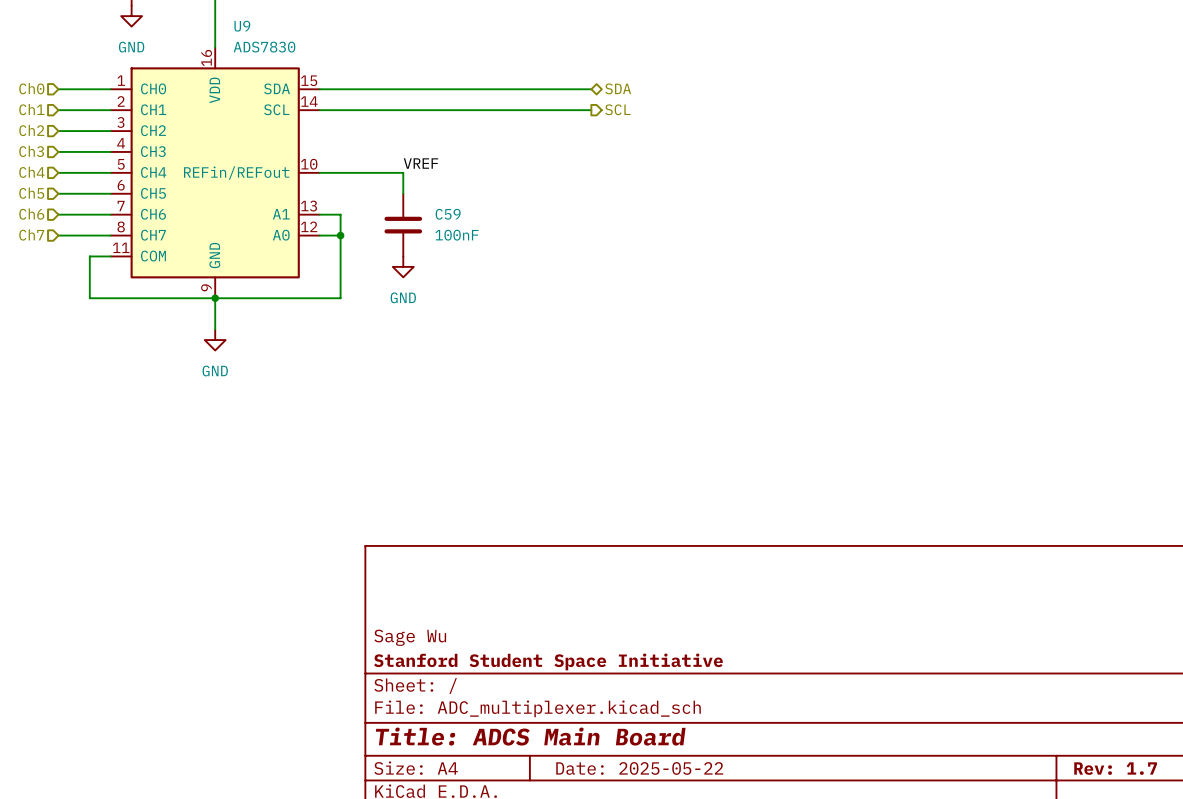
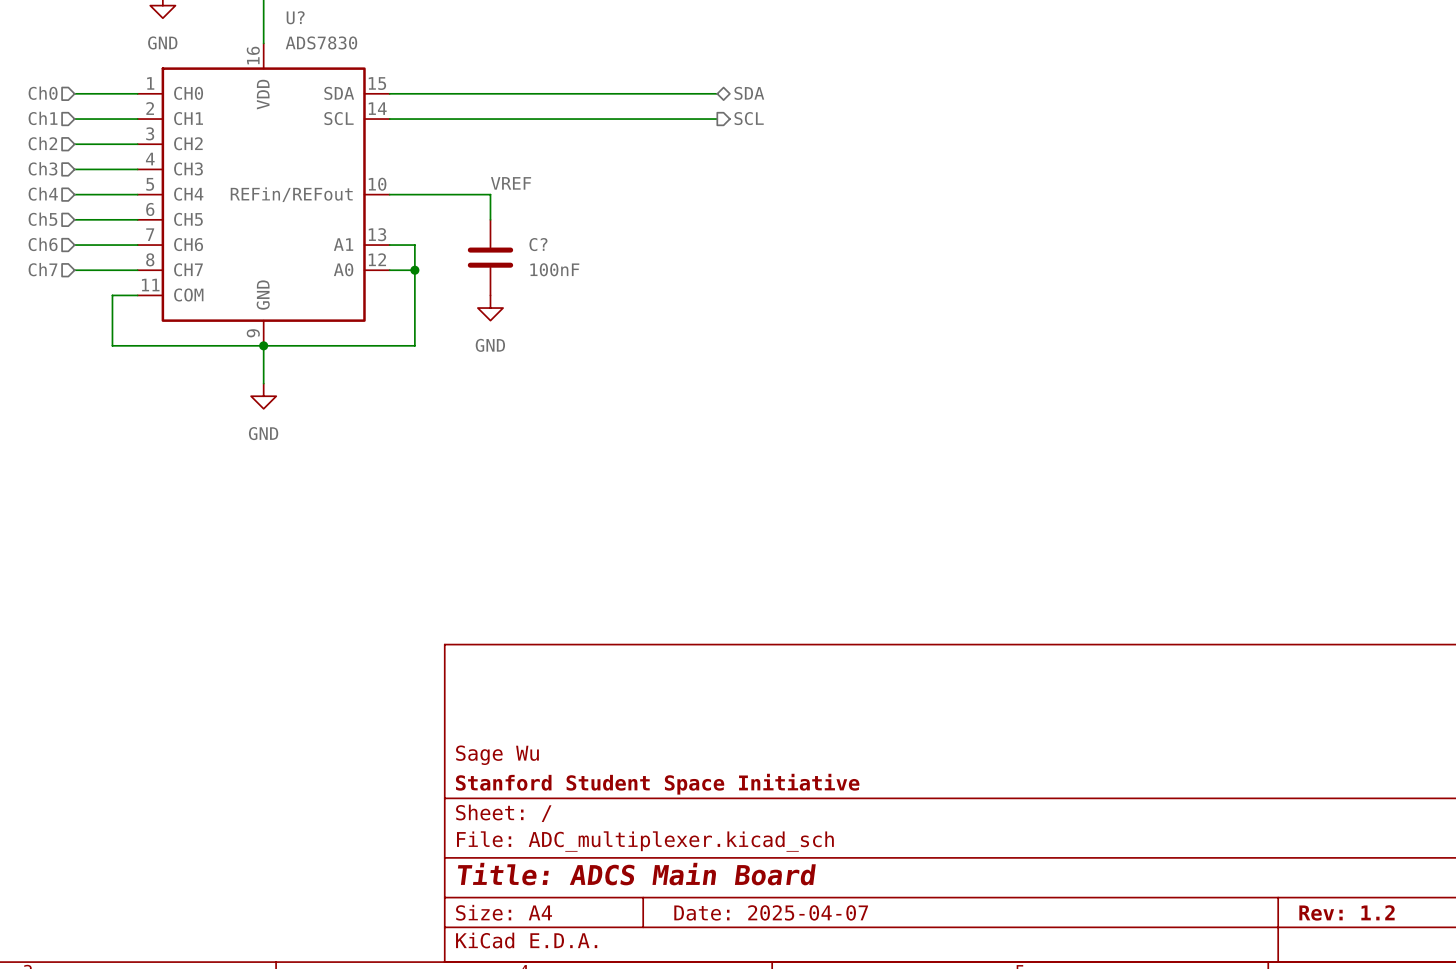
U9 name: U9 (242, 26) -> U? (295, 17)
C59 name: C59 (448, 214) -> C? (538, 244)
title block: Date: 2025-05-22 (639, 768) -> Date: 2025-04-07 (771, 912)
title block: Rev: 1.7 (1115, 768) -> Rev: 1.2 (1347, 912)

